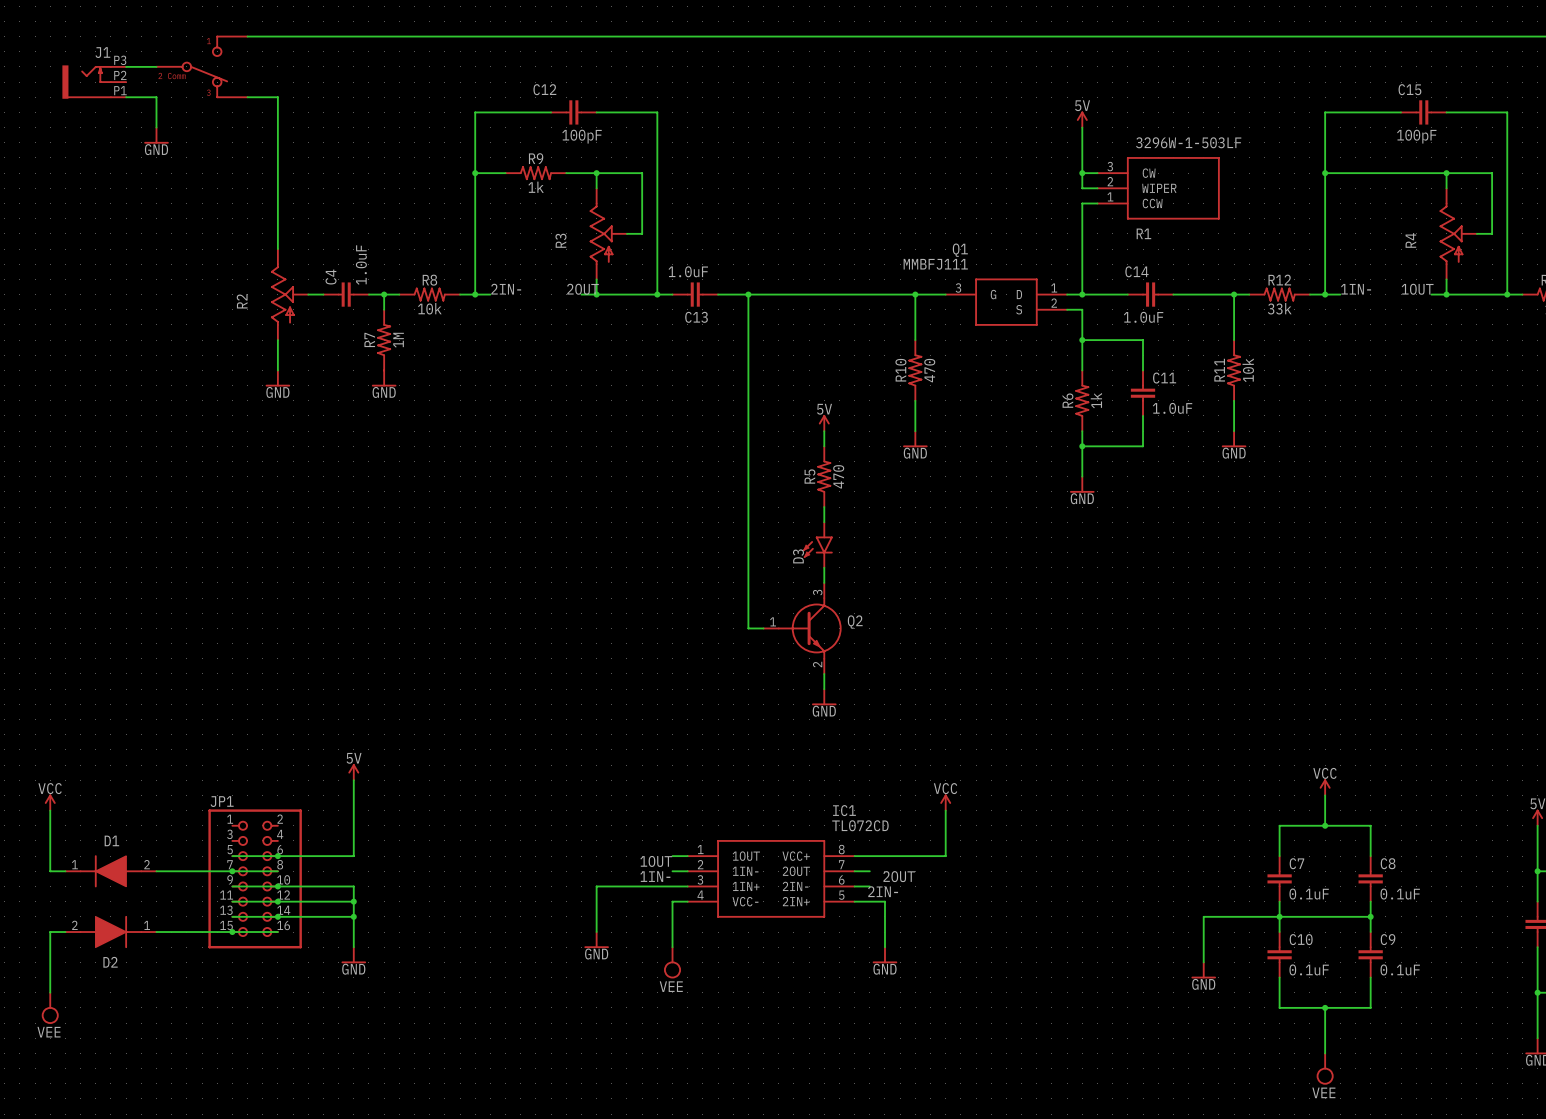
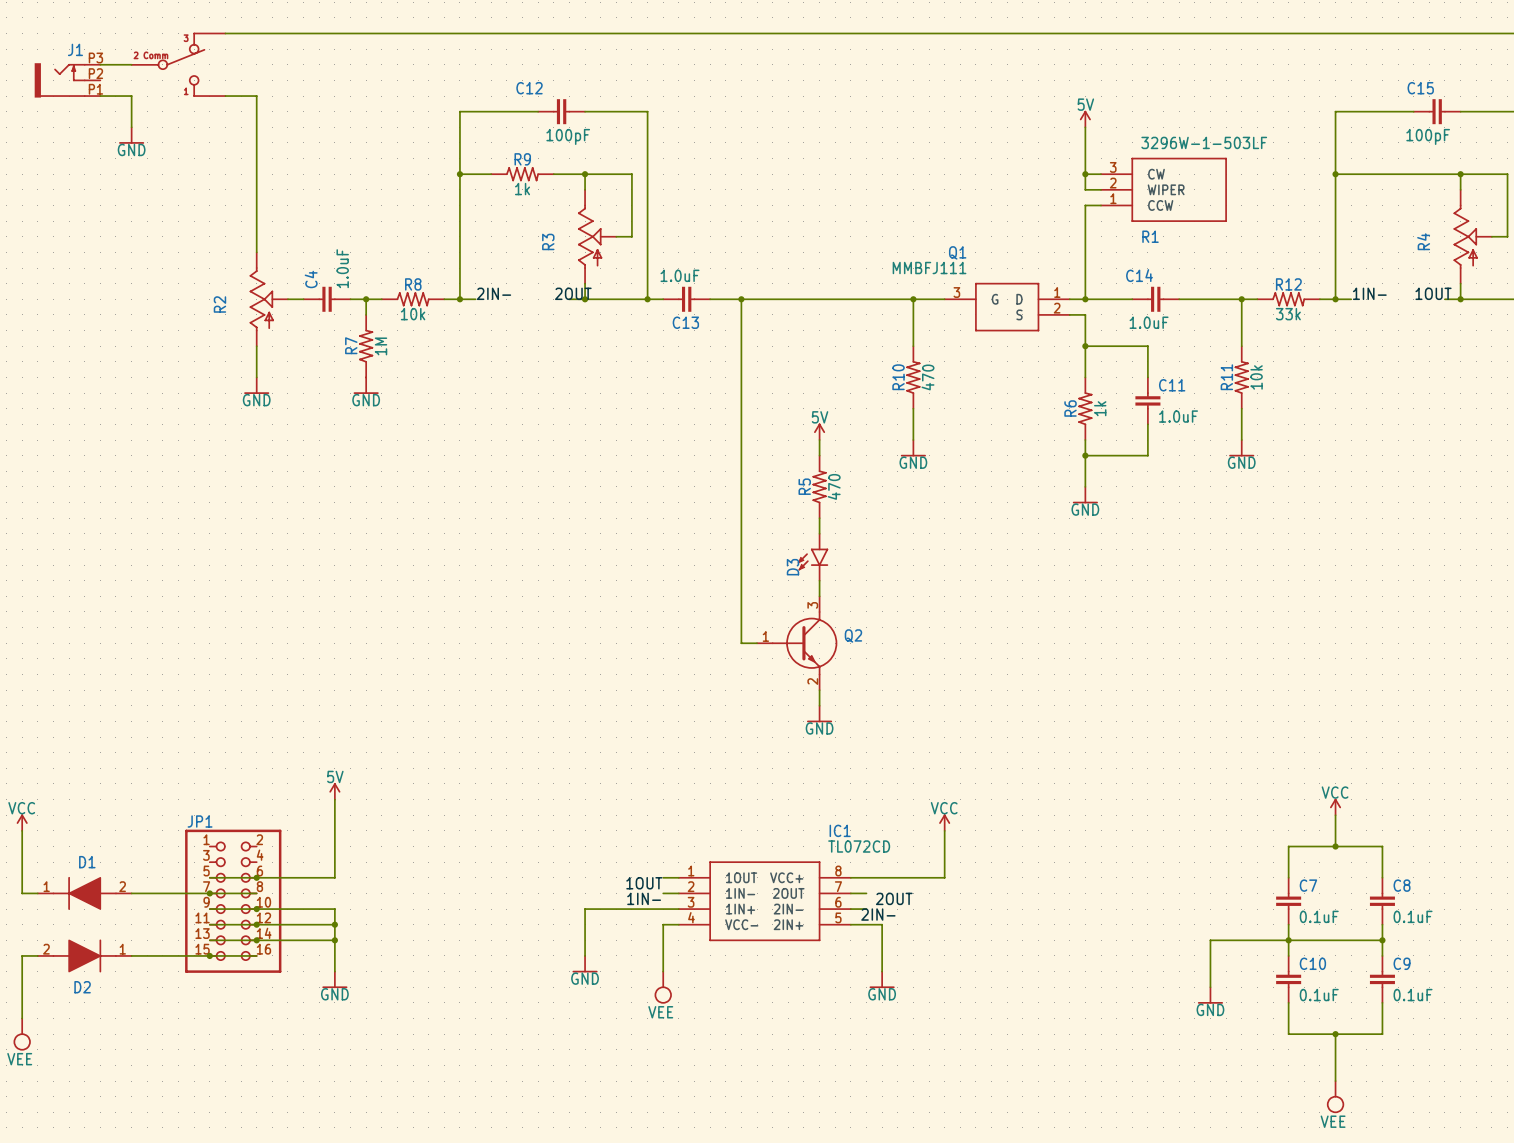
part symbol: [155, 35, 249, 99] -> [130, 32, 227, 97]

